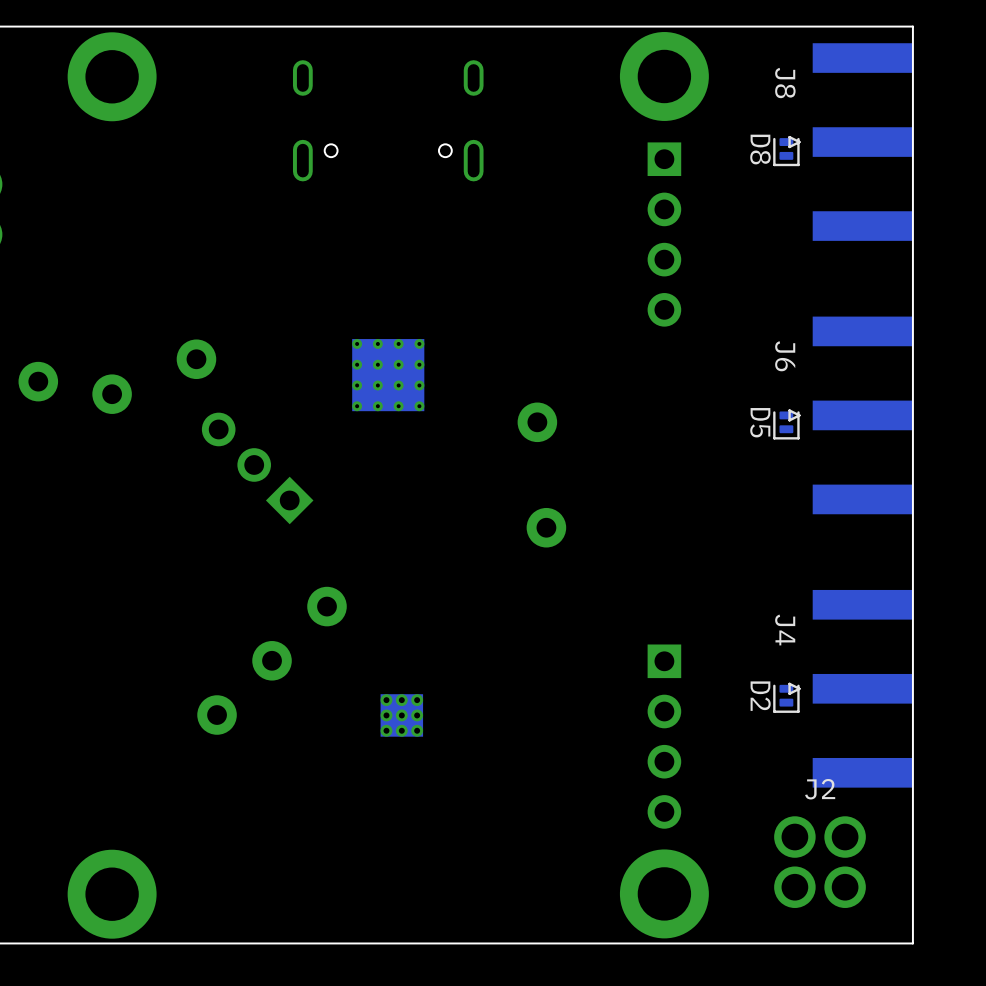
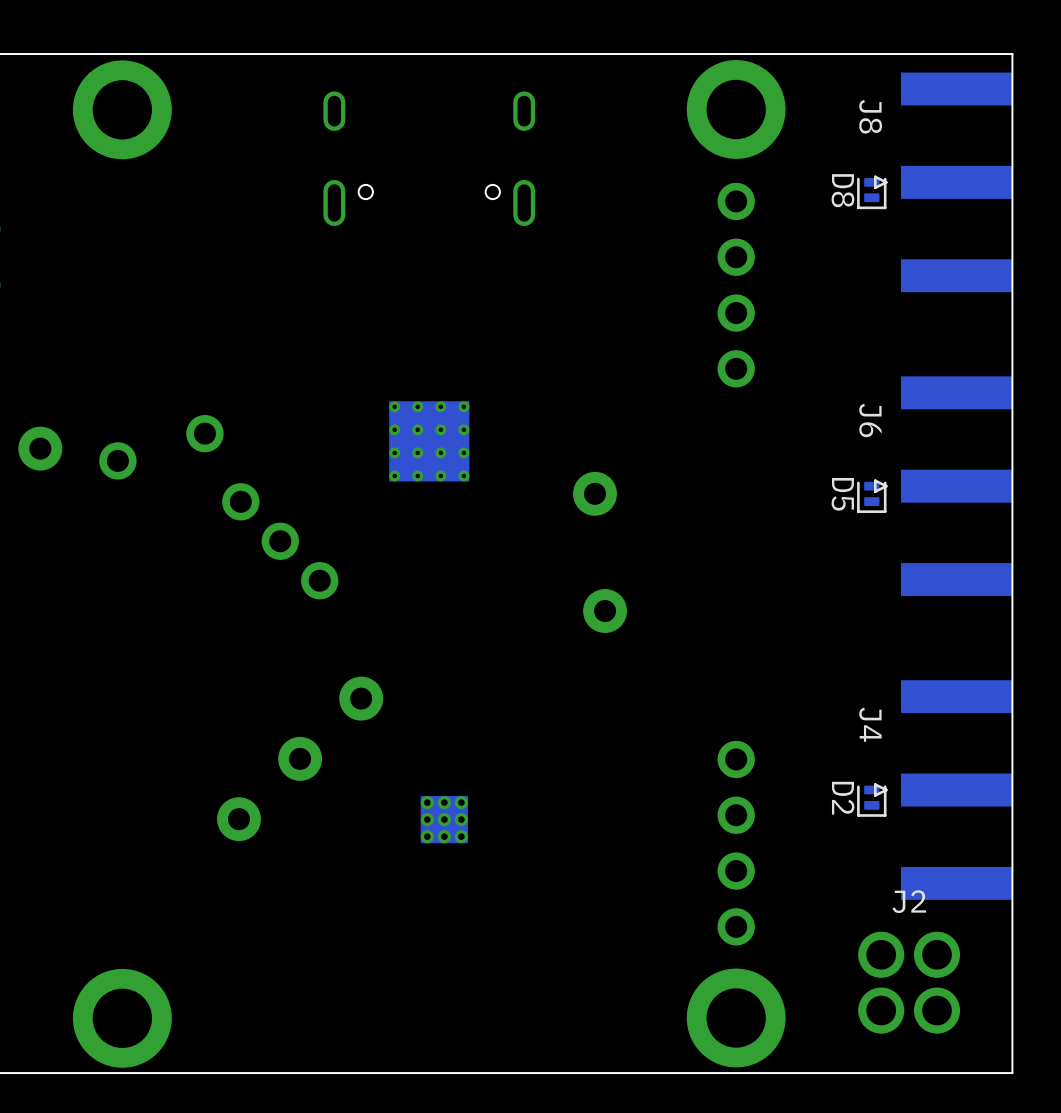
part footprint: [647, 142, 682, 327] -> [717, 182, 755, 388]
part footprint: [176, 339, 217, 380] -> [186, 414, 224, 453]
part footprint: [92, 374, 132, 414] -> [99, 442, 137, 480]
part footprint: [201, 412, 314, 525] -> [222, 483, 339, 600]
part footprint: [647, 644, 682, 829] -> [717, 740, 755, 946]

